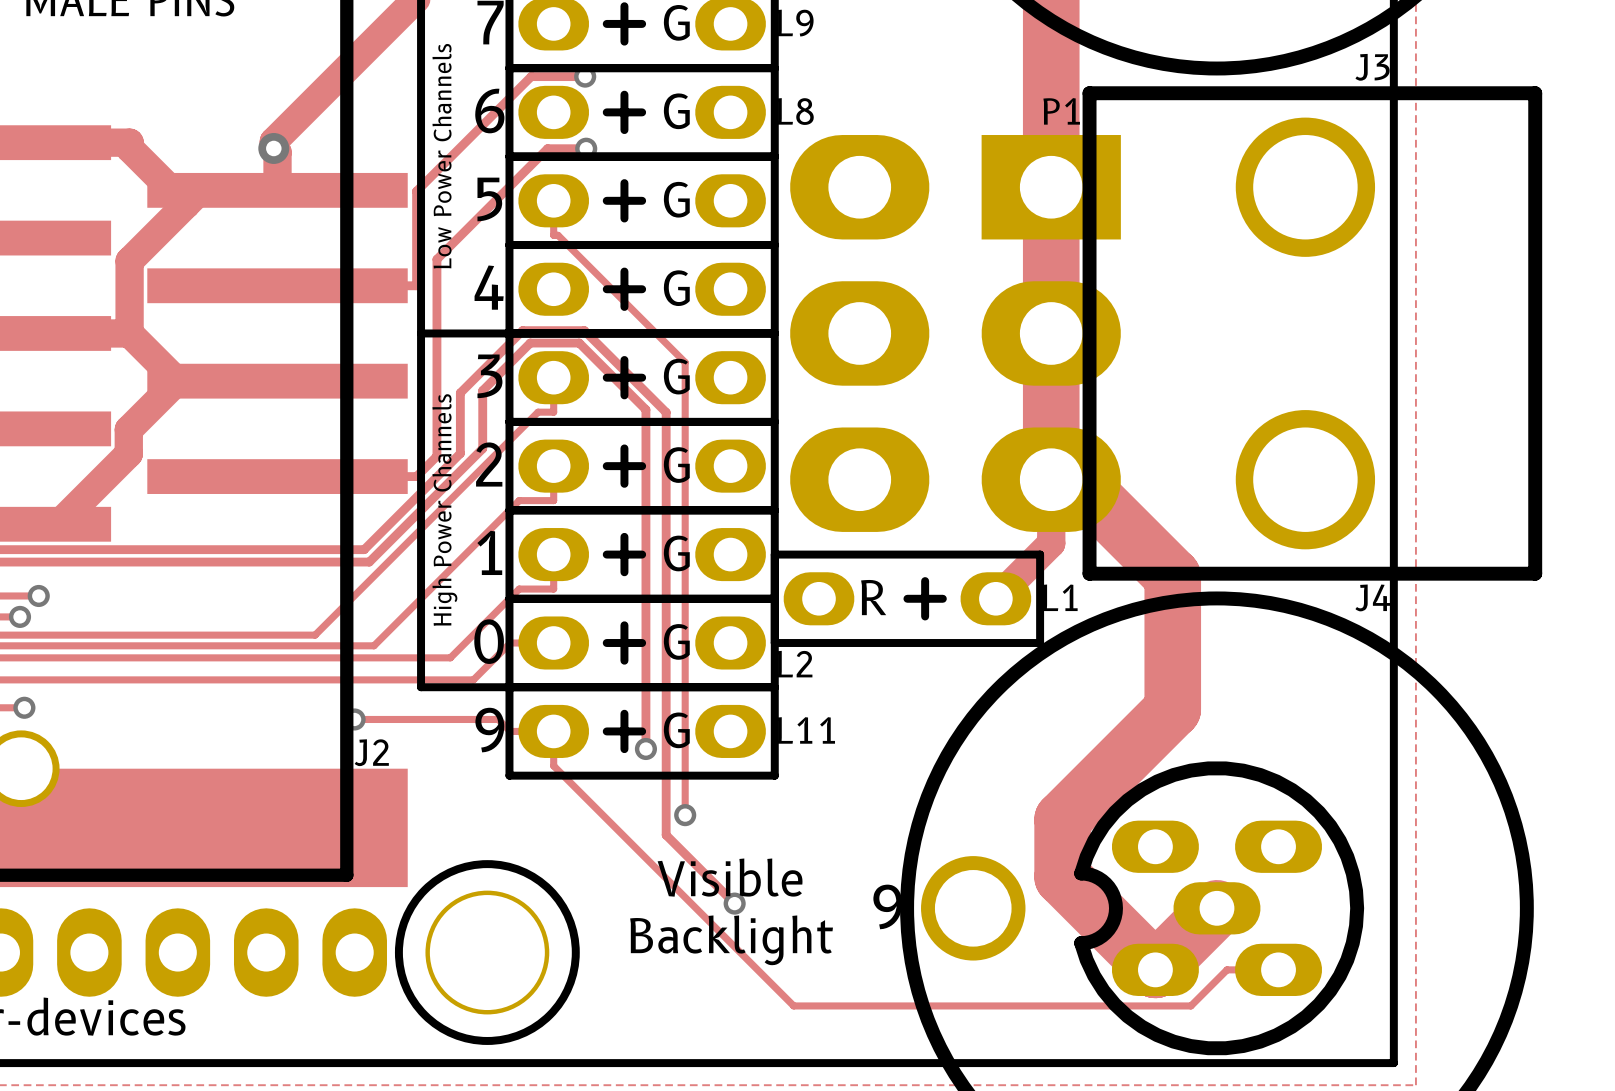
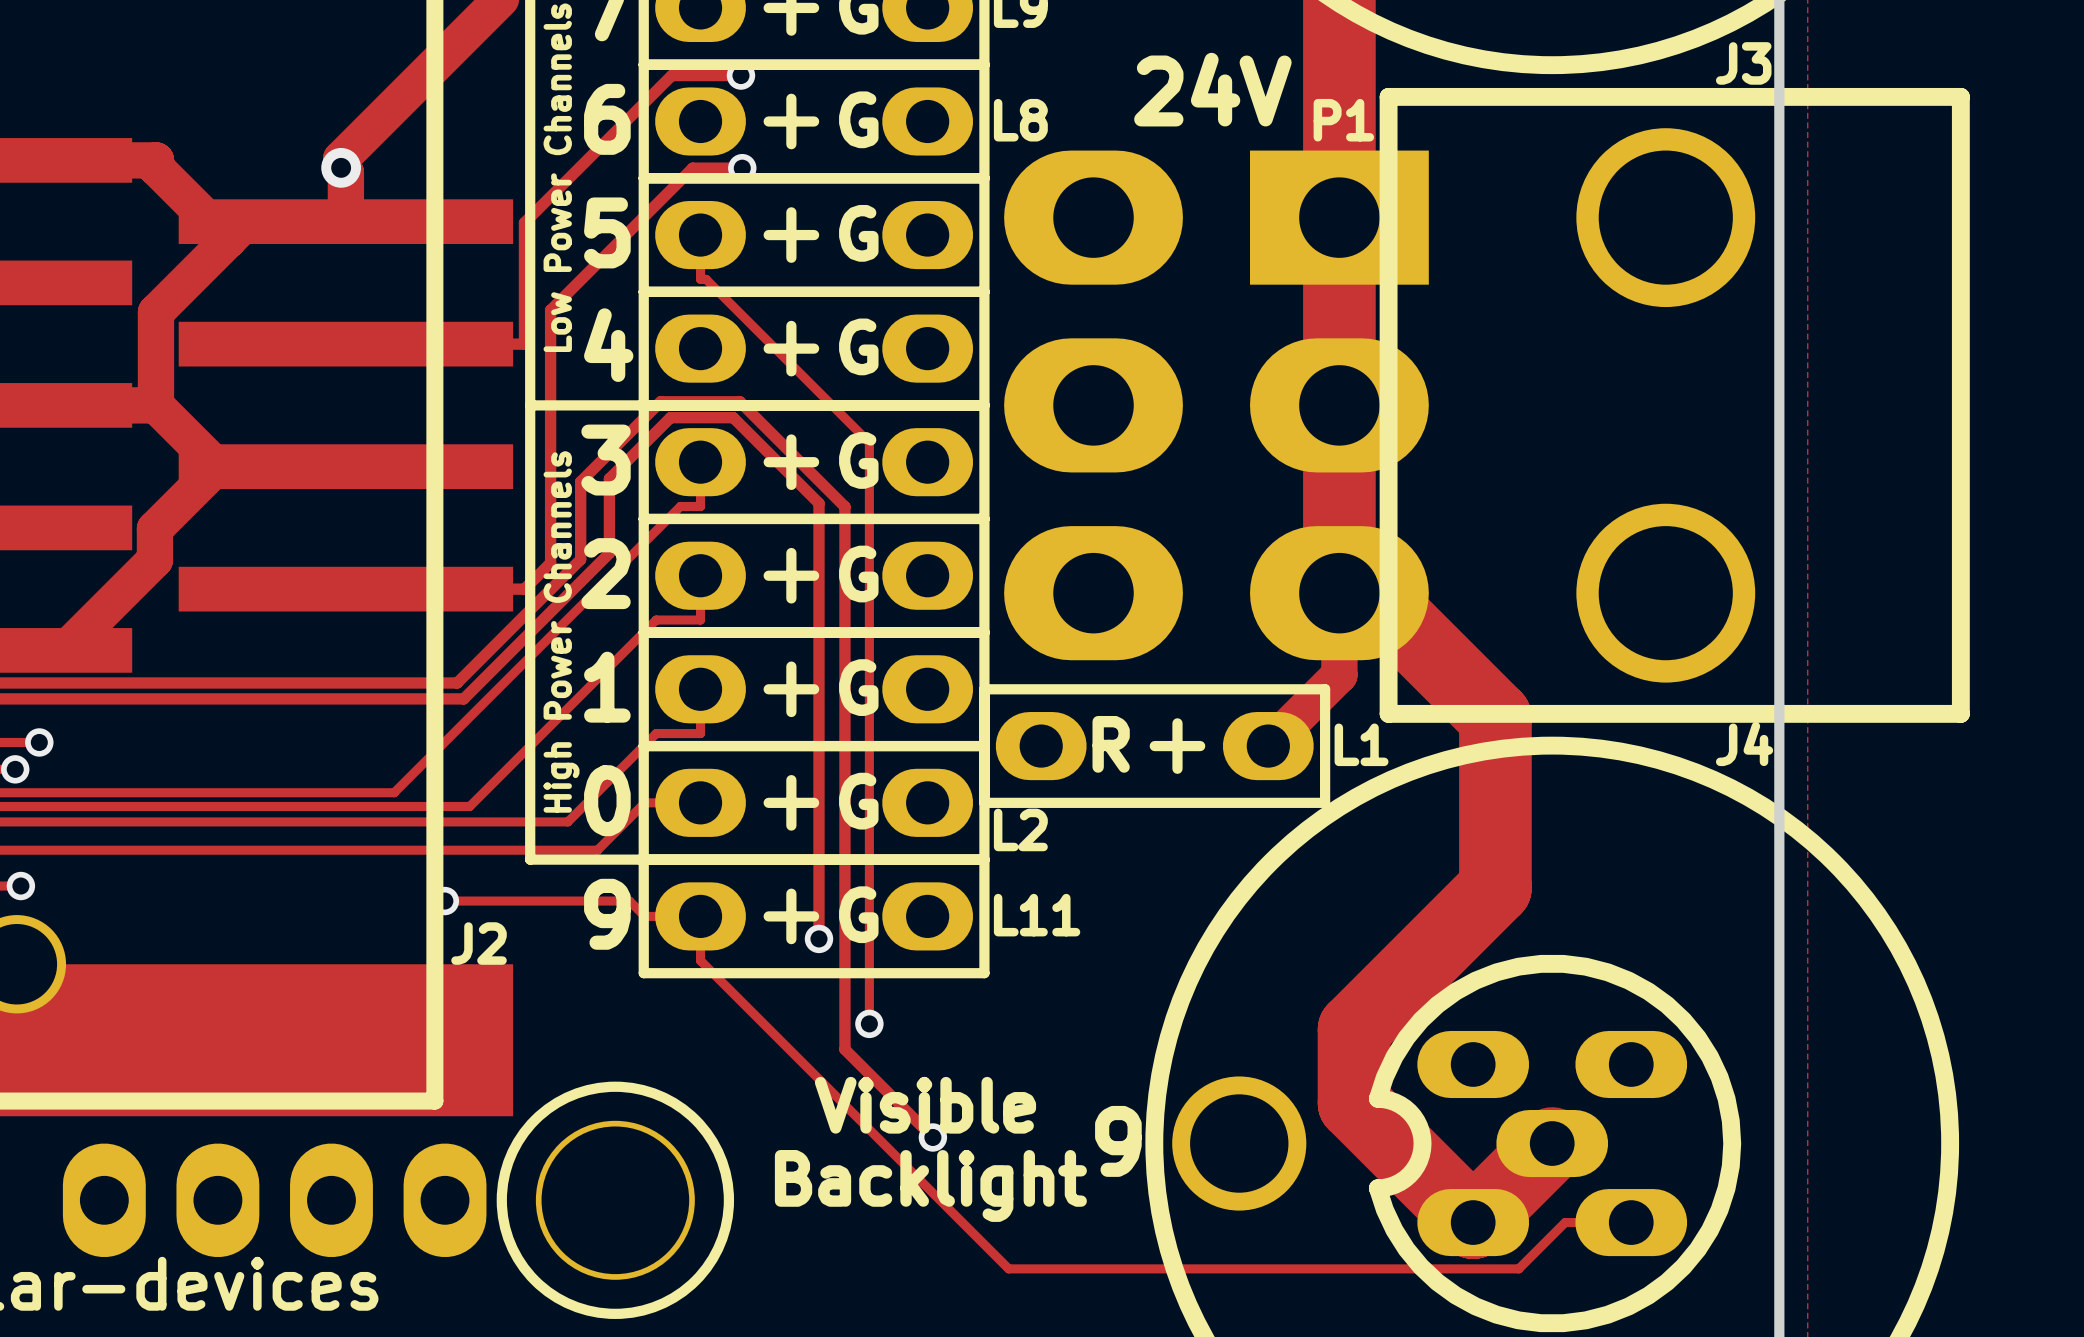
text: none -> 24V (1212, 89)

